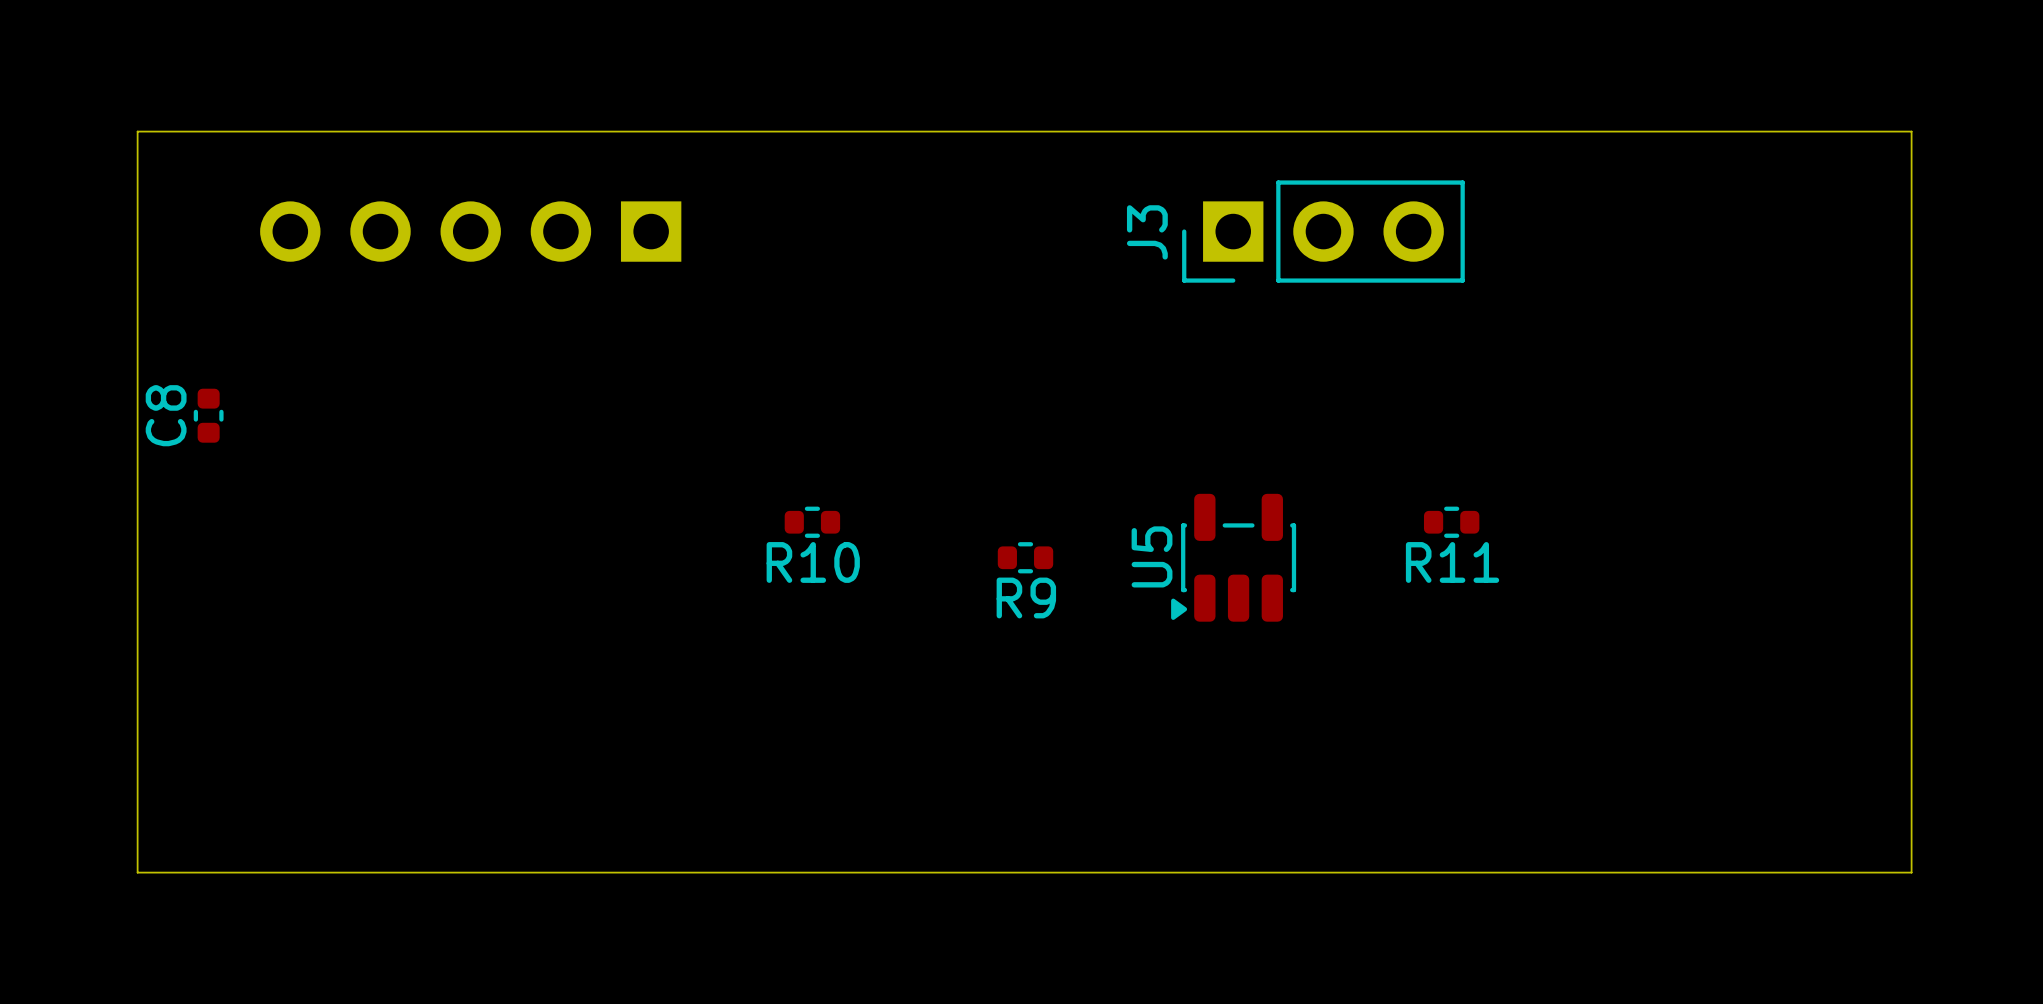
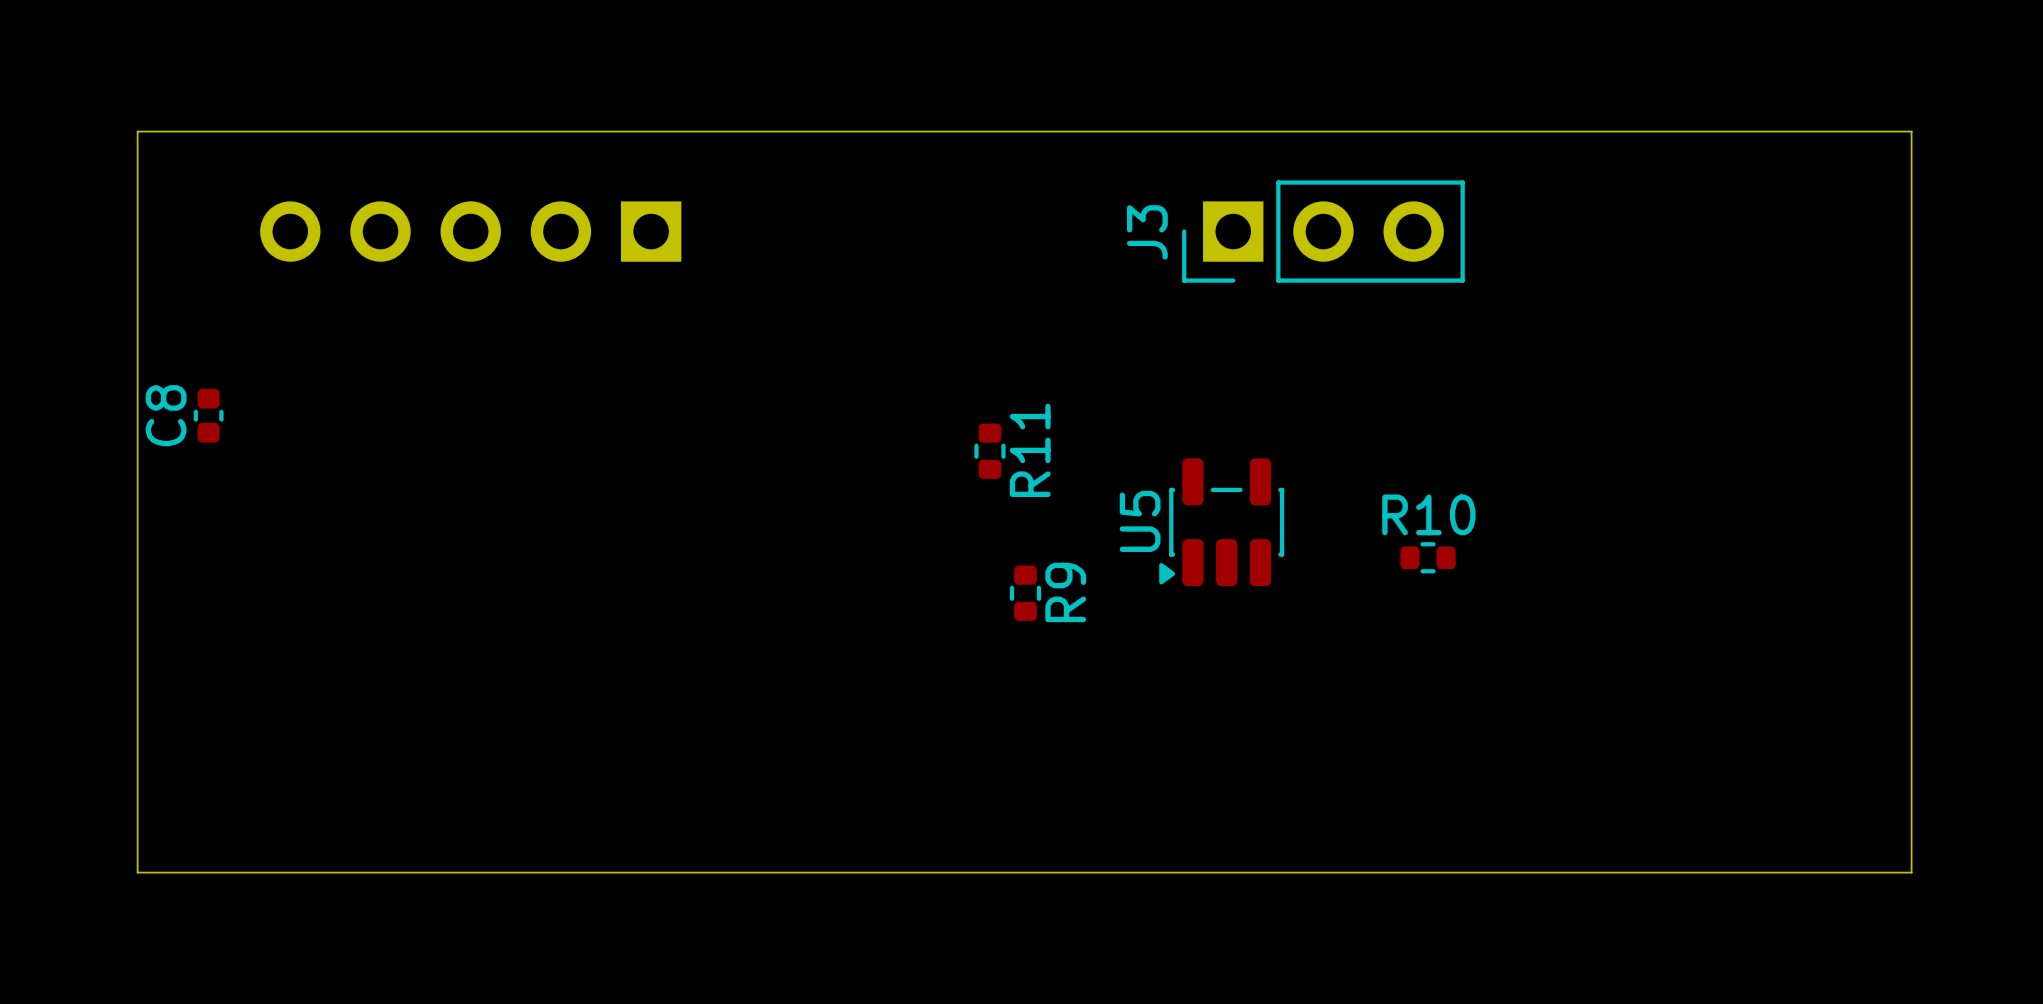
R10 position: (812, 522) -> (1428, 557)
R11 rotation: 0° (1451, 522) -> 90° clockwise (989, 451)
R11 position: (1451, 522) -> (989, 451)
R9 rotation: 0° (1025, 557) -> 90° clockwise (1025, 593)
R9 position: (1025, 557) -> (1025, 593)
U5 position: (1233, 557) -> (1221, 522)
R10 name position: R10 (813, 562) -> R10 (1428, 514)

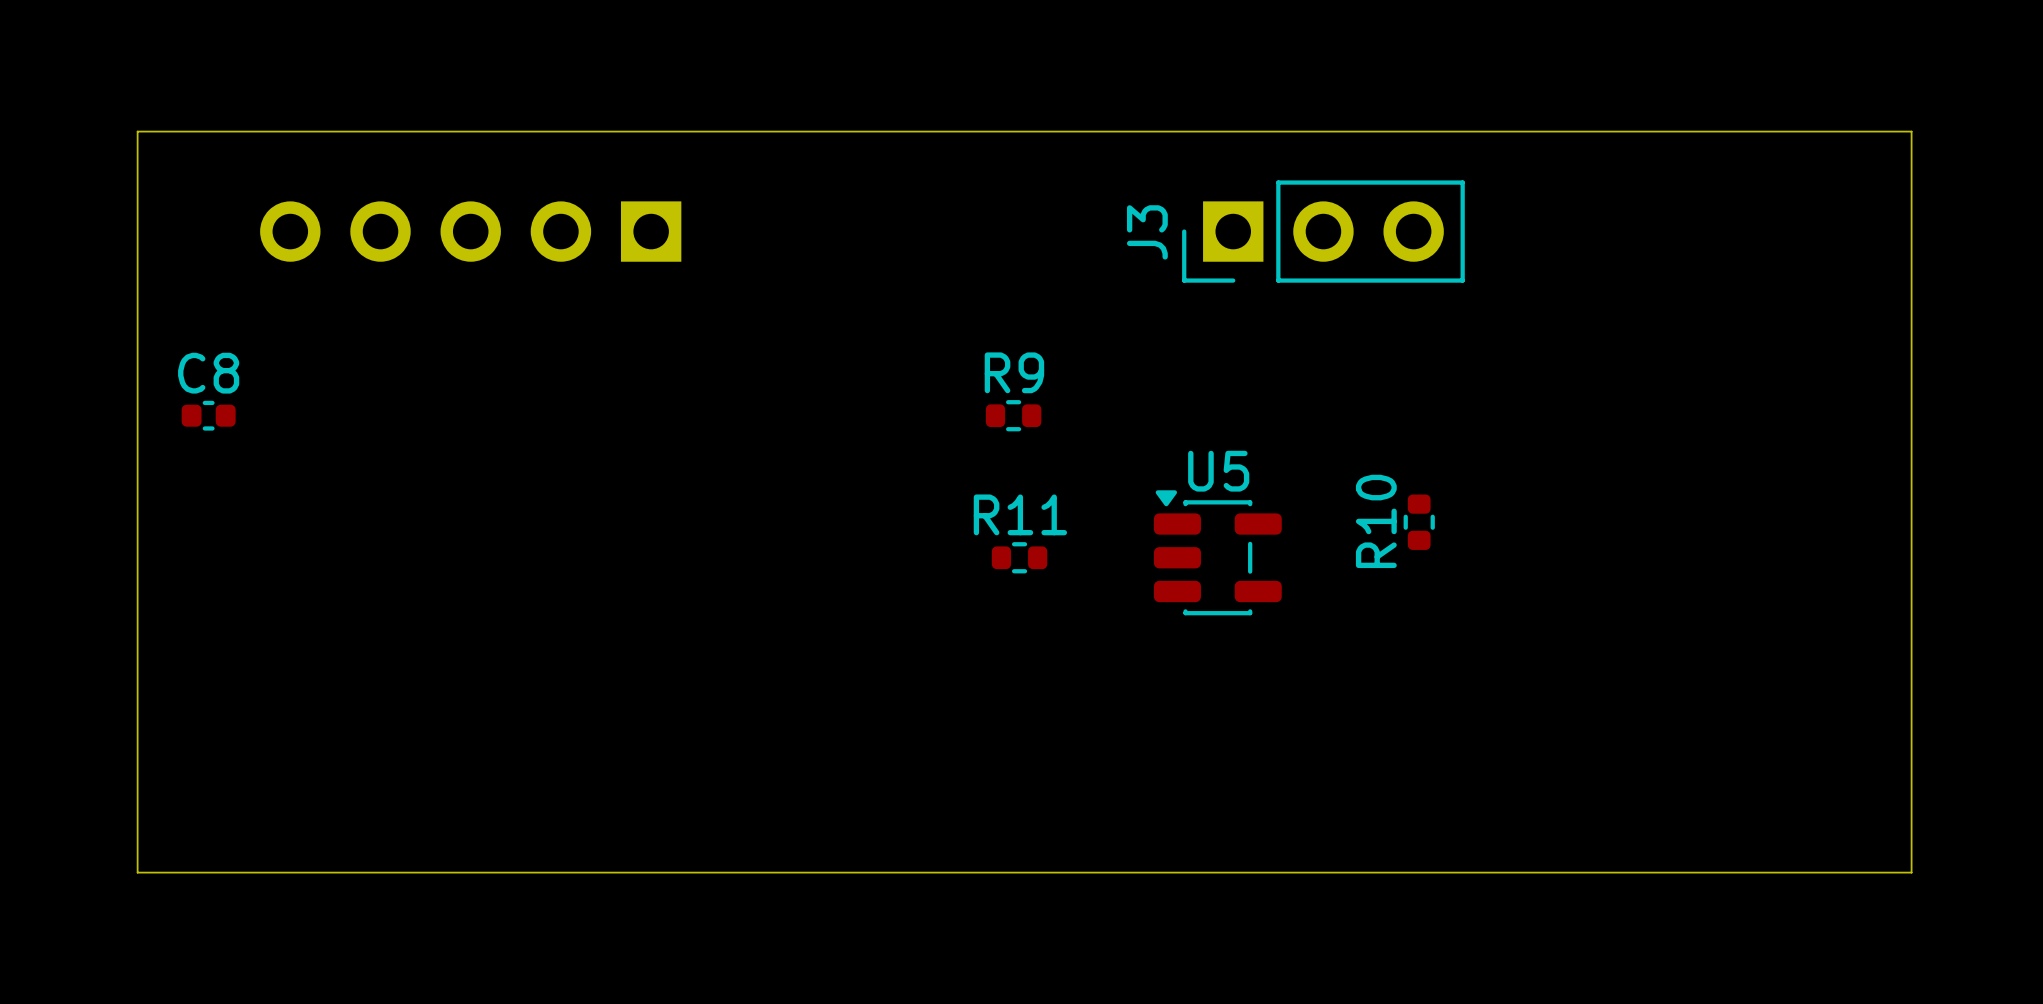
C8 rotation: 0° (208, 415) -> 90° clockwise (208, 415)
R11 rotation: 0° (989, 451) -> 90° clockwise (1019, 557)
R11 position: (989, 451) -> (1019, 557)
U5 rotation: 0° (1221, 522) -> 90° clockwise (1217, 552)
R10 rotation: 0° (1428, 557) -> 90° clockwise (1419, 522)
R10 position: (1428, 557) -> (1419, 522)
R9 rotation: 0° (1025, 593) -> 90° clockwise (1013, 415)
R9 position: (1025, 593) -> (1013, 415)

